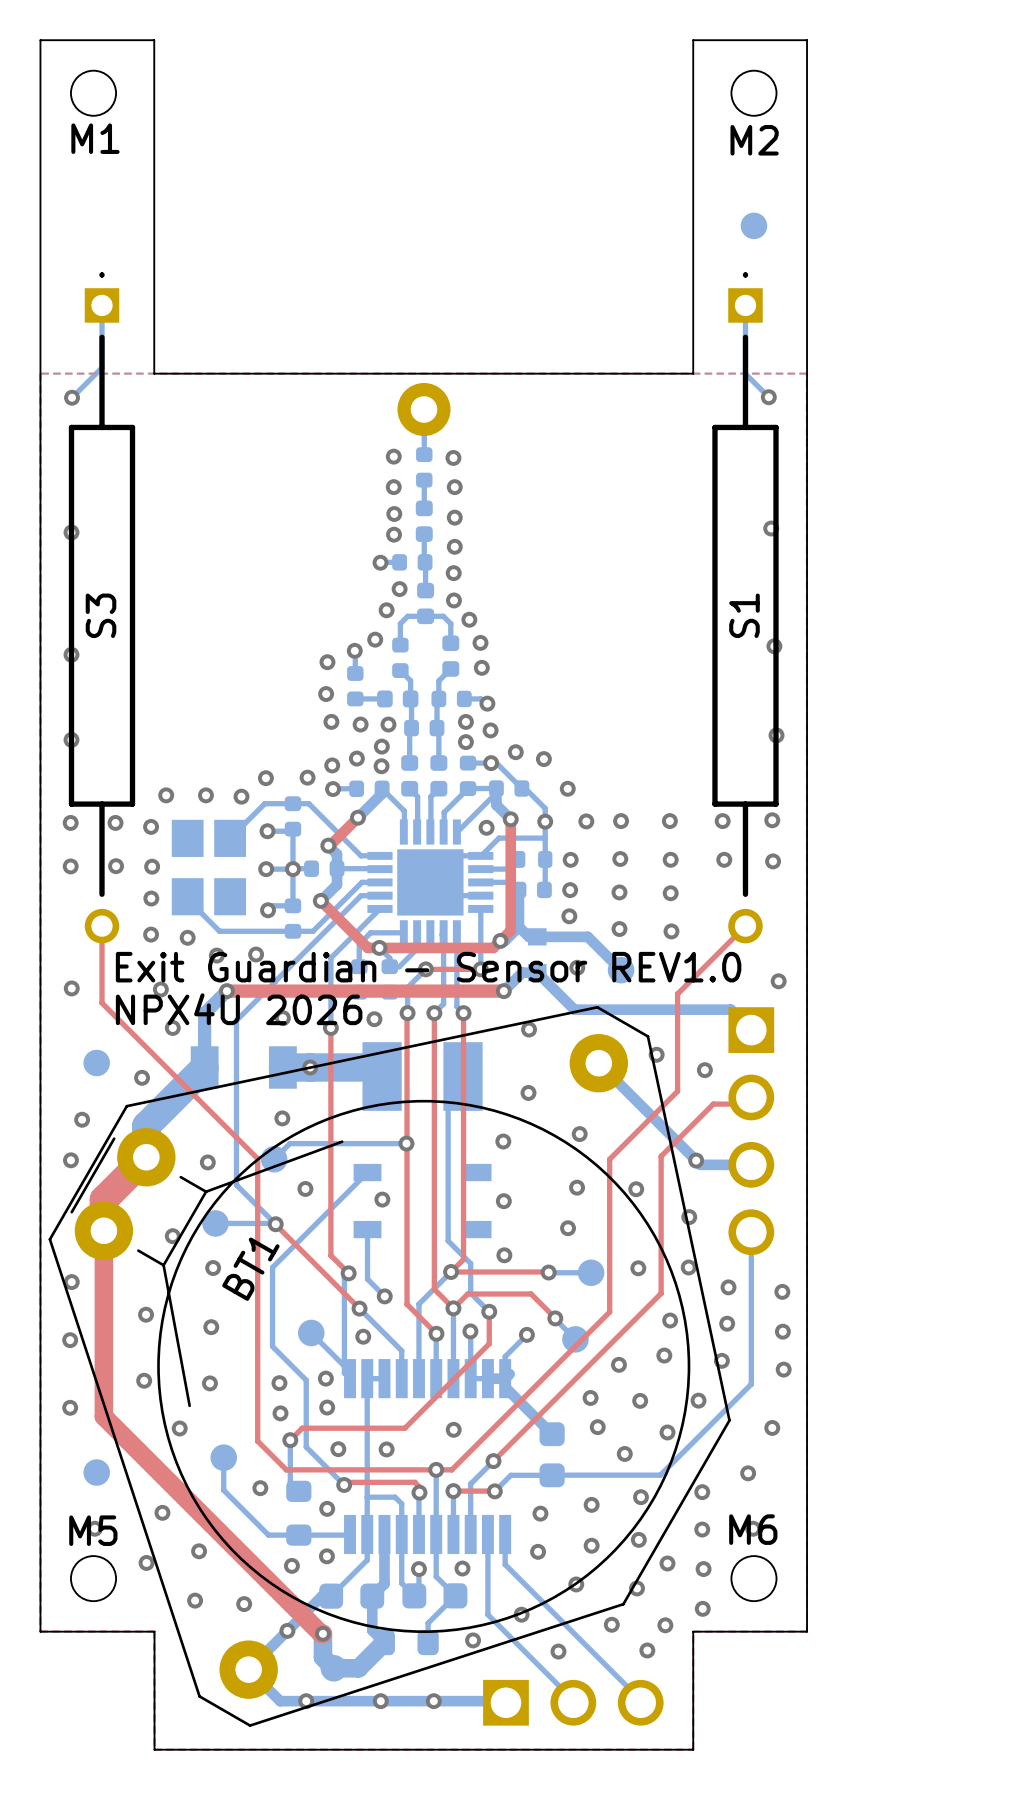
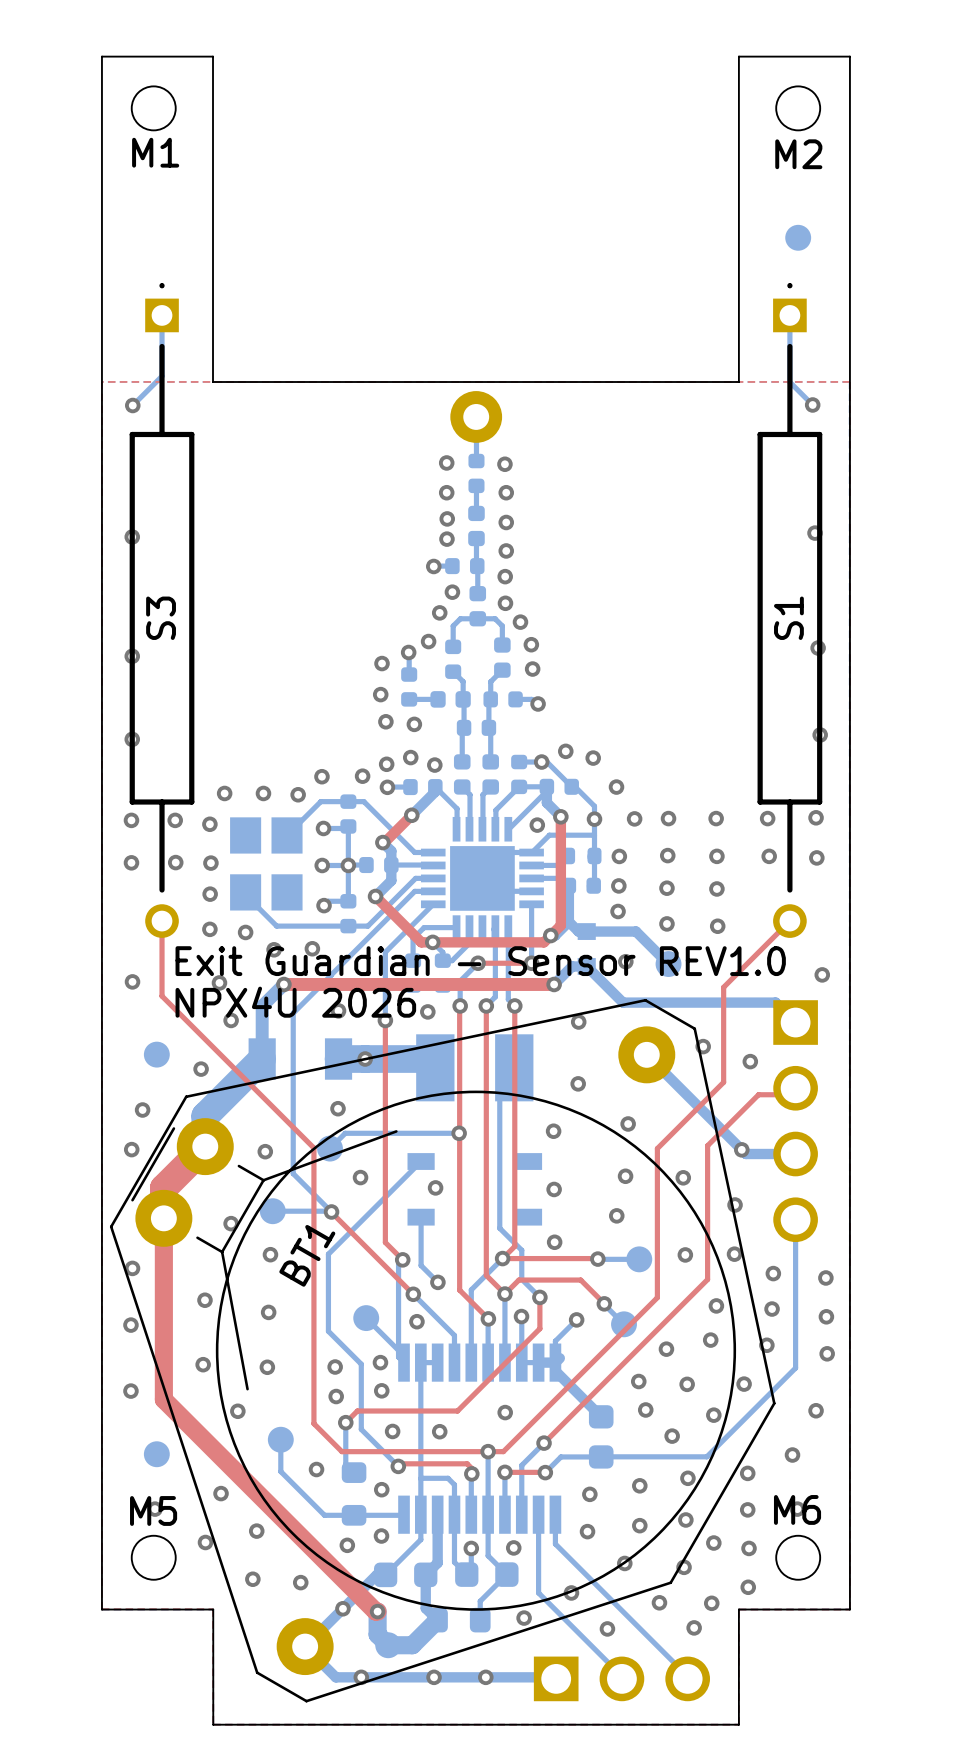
via: (465, 721) -> none
via: (388, 724) -> none
via: (490, 730) -> none
via: (465, 742) -> none
via: (381, 746) -> none

